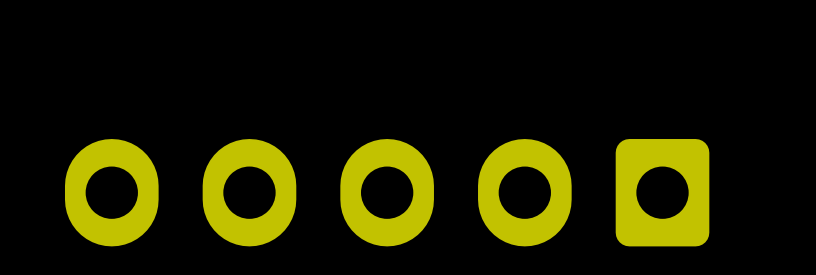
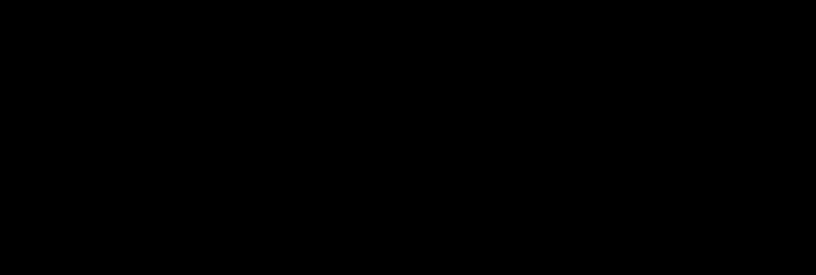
part: (387, 192) -> none

